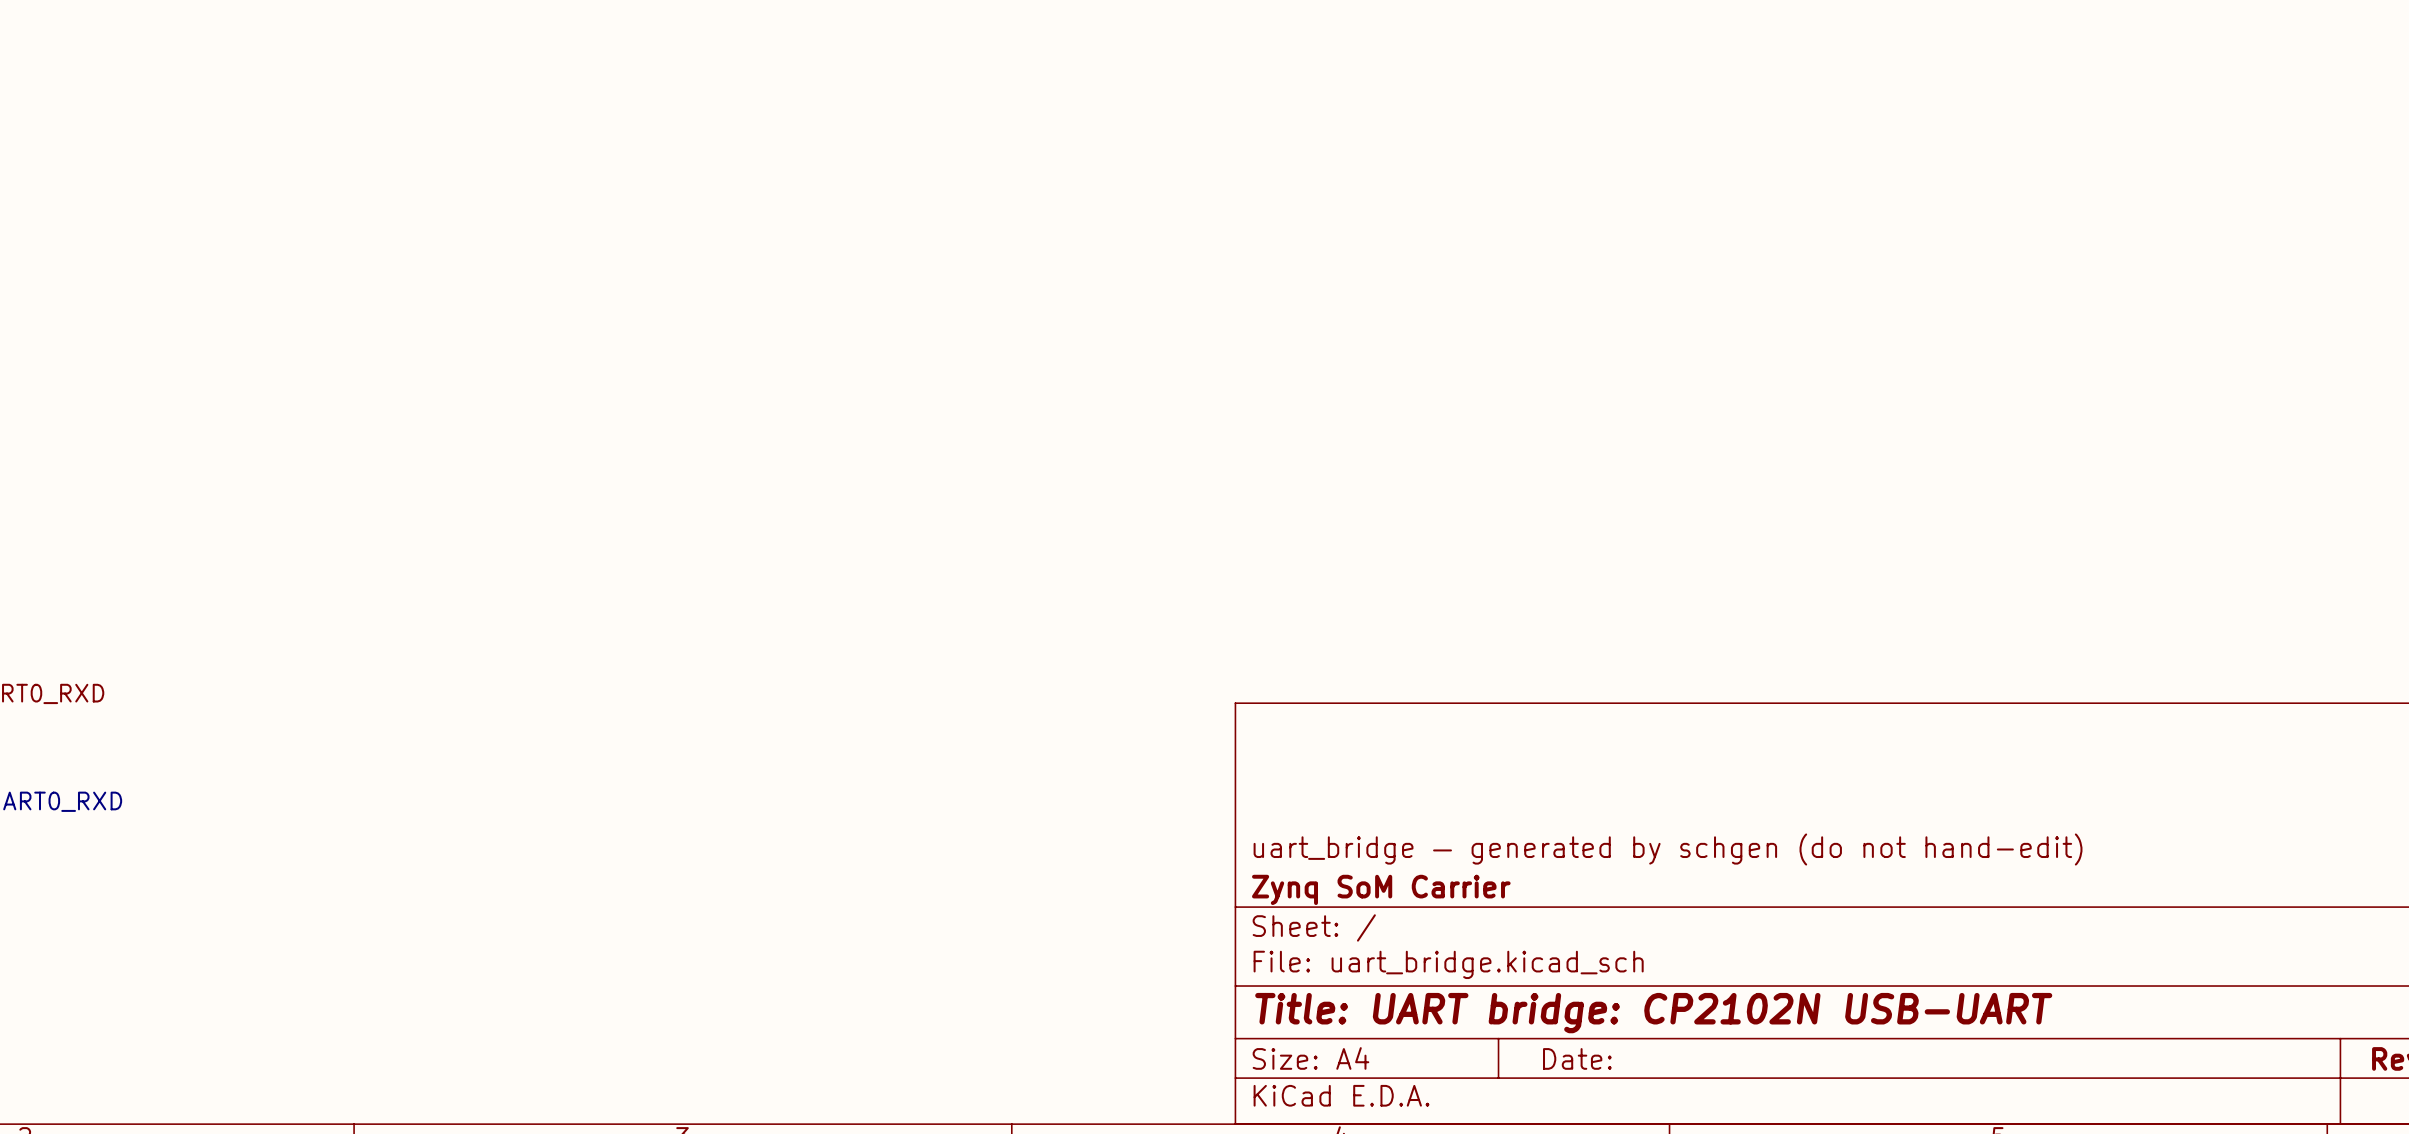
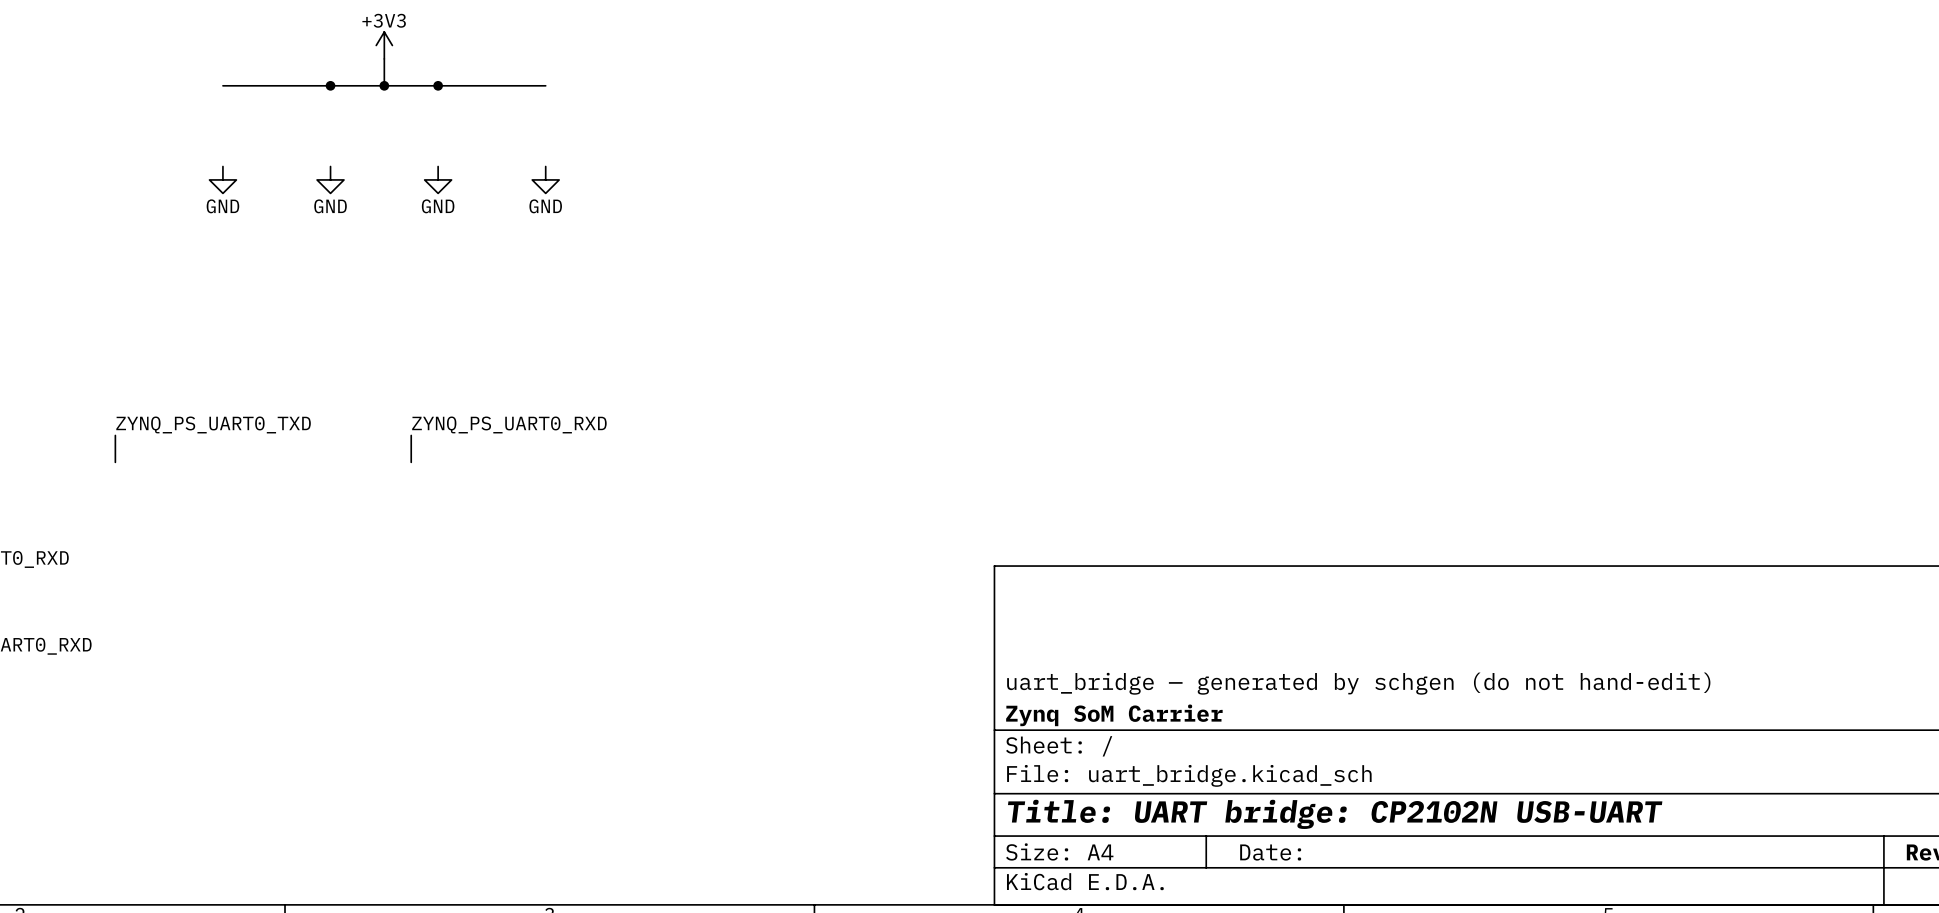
power symbol: none -> +3V3 (384, 45)
wire: none -> (384, 58) (384, 85)
wire: none -> (222, 85) (545, 85)
junction: none -> (330, 85)
junction: none -> (384, 85)
junction: none -> (438, 85)
power symbol: none -> GND (222, 179)
power symbol: none -> GND (330, 179)
power symbol: none -> GND (438, 179)
power symbol: none -> GND (545, 179)
label: none -> ZYNQ_PS_UART0_TXD (213, 424)
label: none -> ZYNQ_PS_UART0_RXD (509, 424)
wire: none -> (115, 435) (115, 462)
wire: none -> (411, 435) (411, 462)

